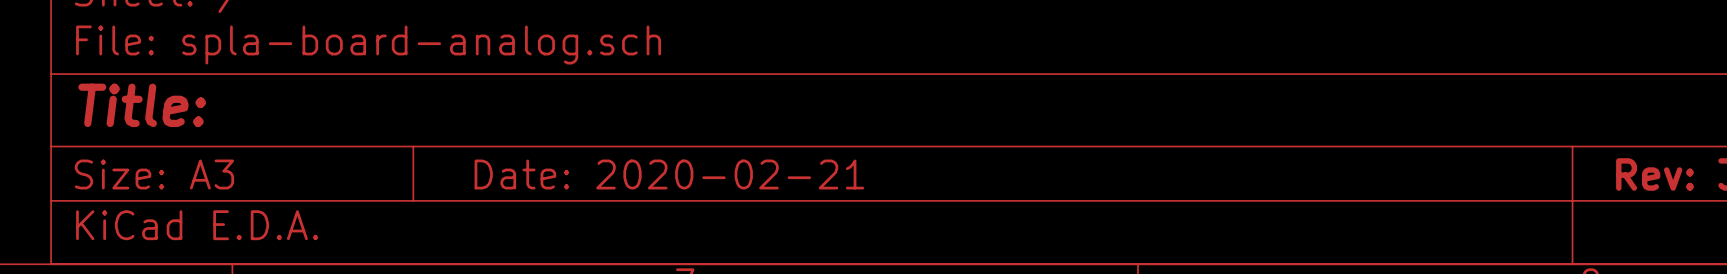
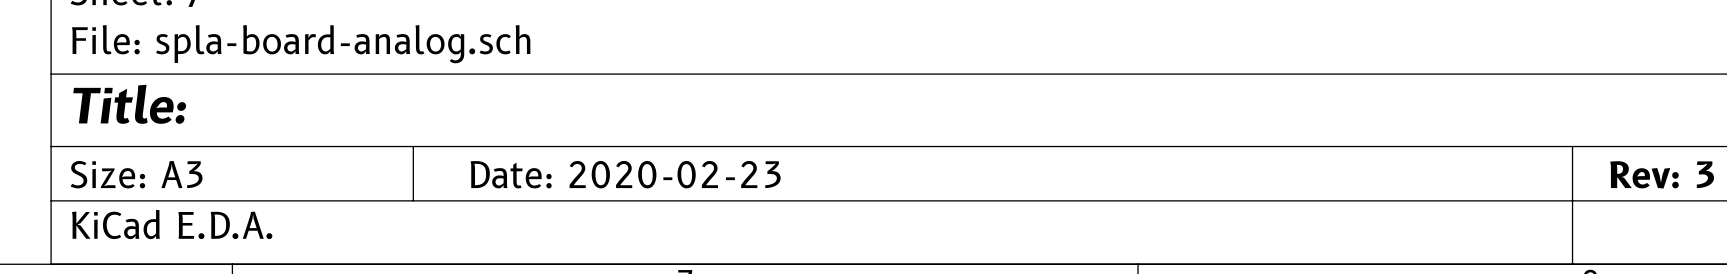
title block: Date: 2020-02-21 (669, 174) -> Date: 2020-02-23 (625, 174)

